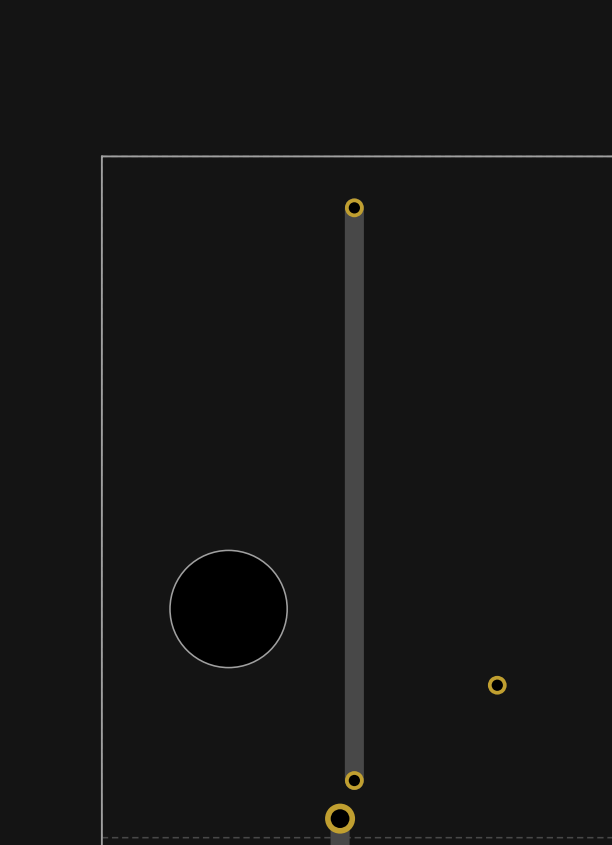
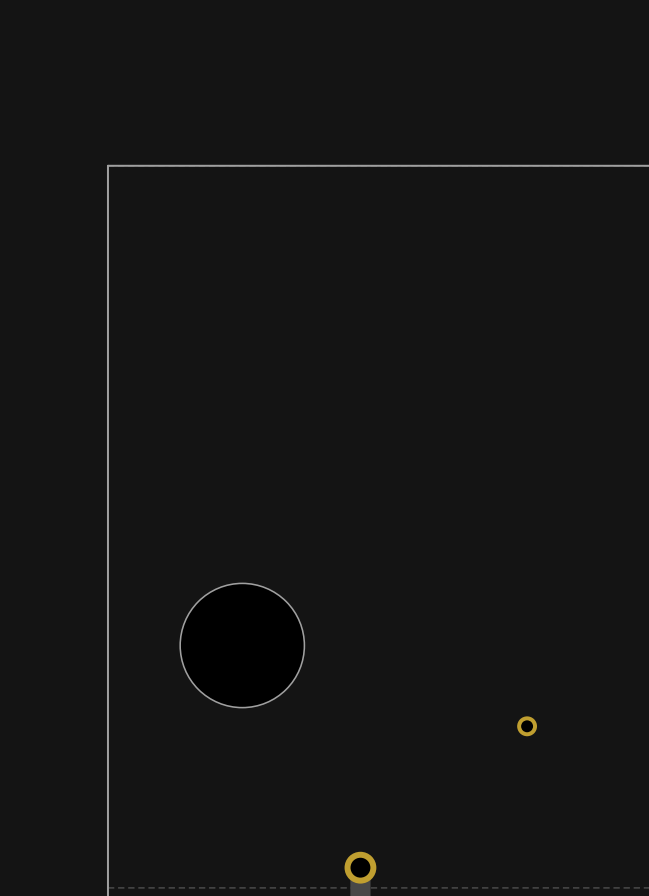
track: (354, 207) (354, 780) -> none
via: (354, 207) -> none
via: (354, 780) -> none

